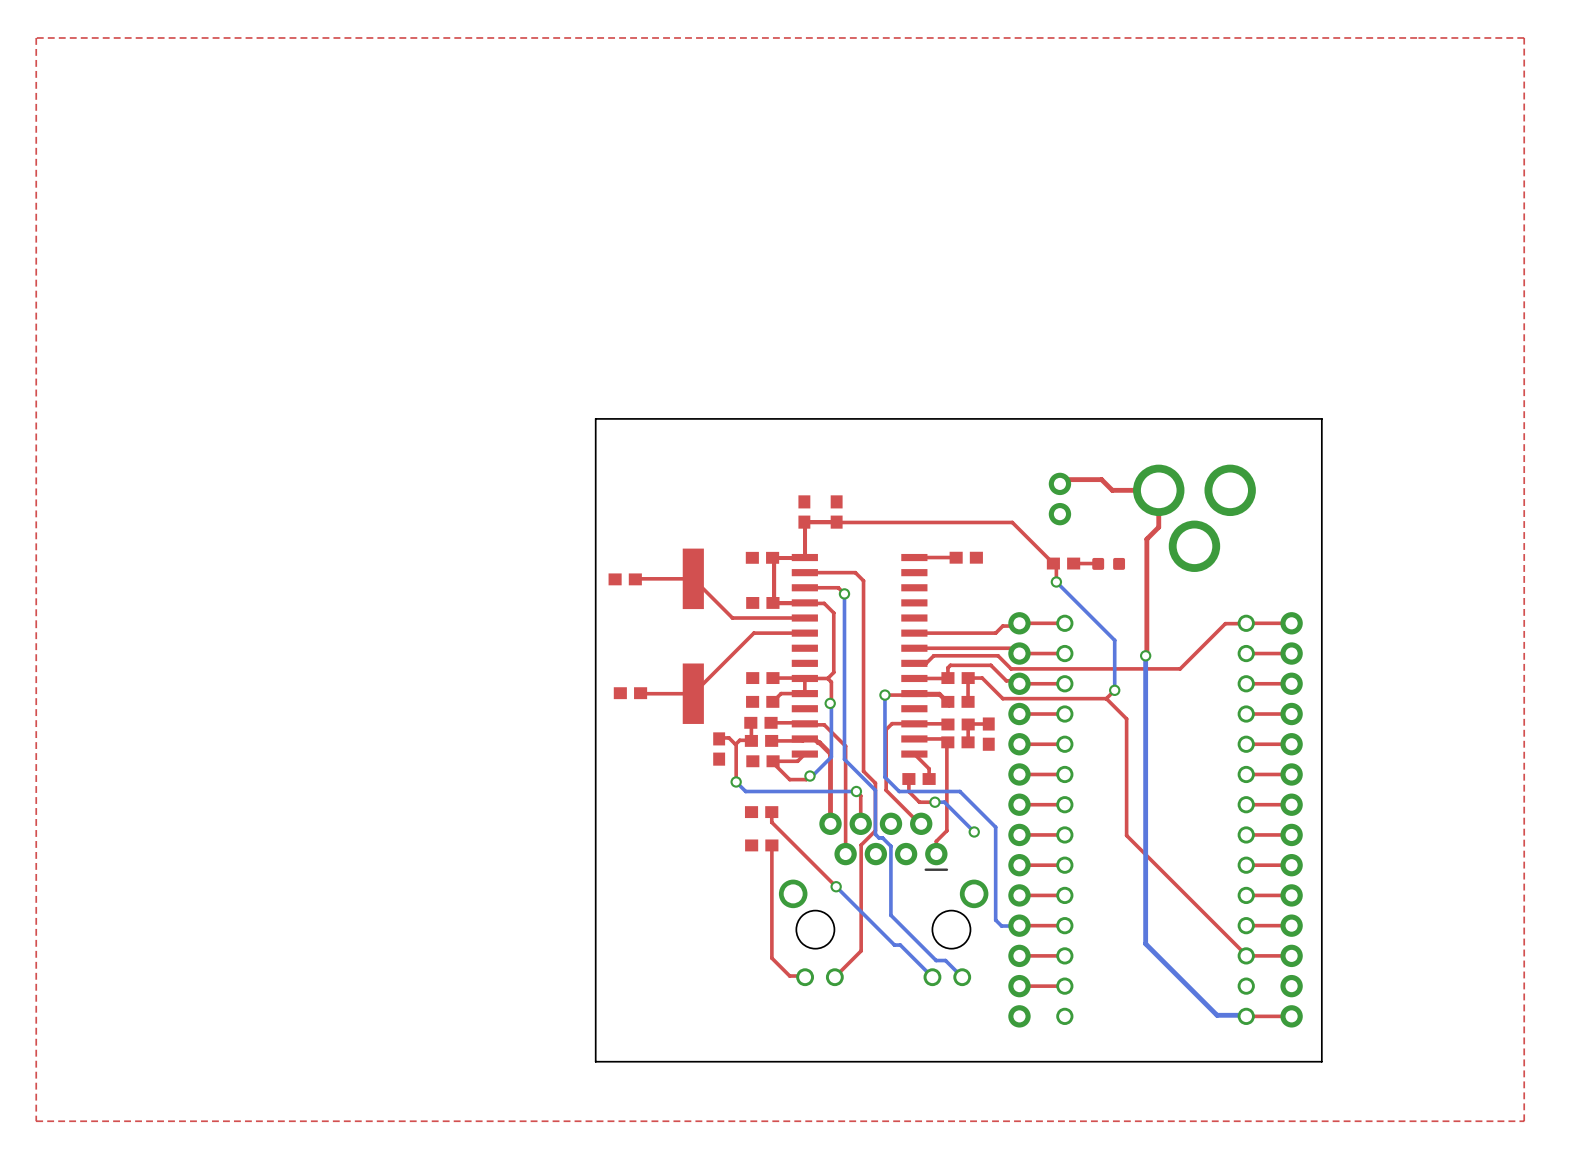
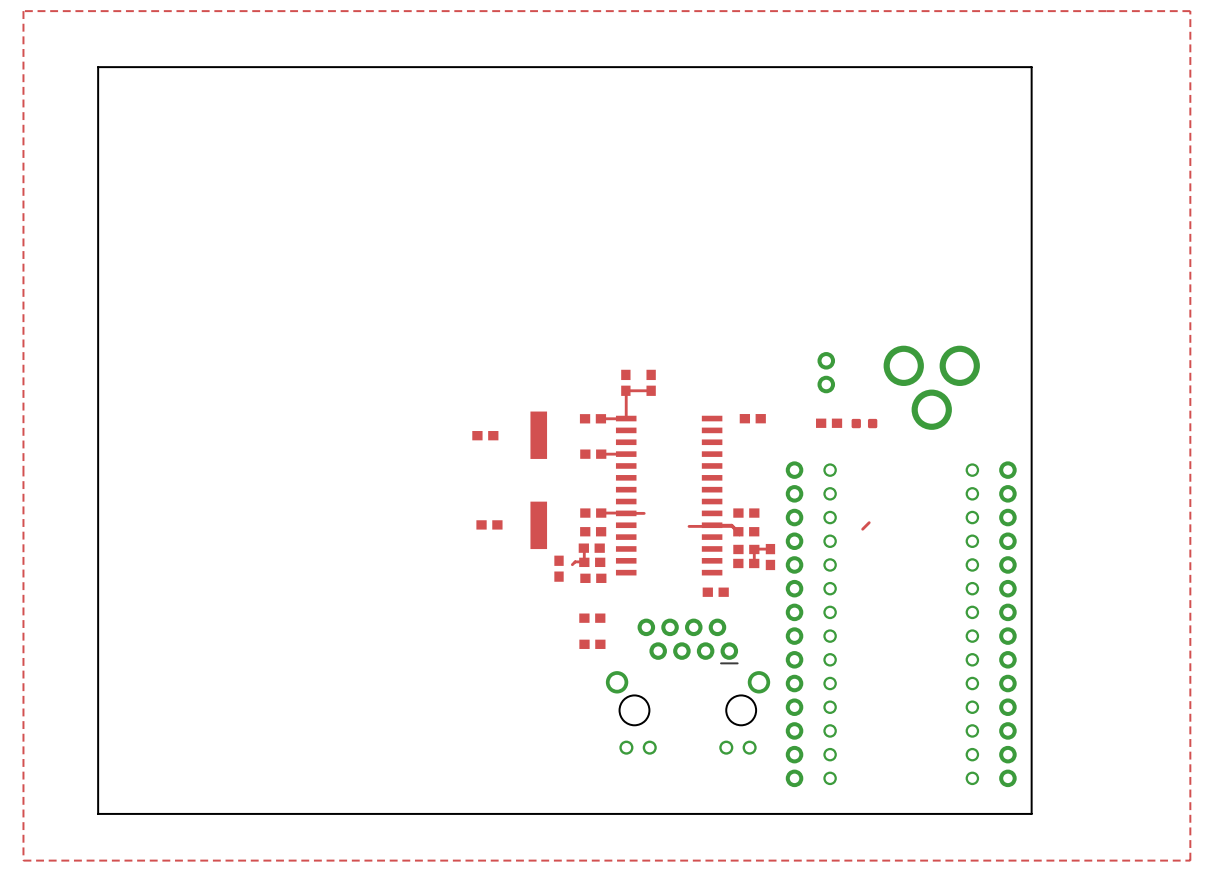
board edge: (1321, 418) (595, 418) (595, 1061) -> (1031, 309) (1031, 67) (98, 67) (98, 813) (462, 813)
top track: (1059, 483) (1064, 479) (1101, 479) (1112, 490) (1158, 490) (1158, 527) (1146, 539) (1145, 655) -> none
top track: (914, 557) (956, 557) -> none
top track: (1073, 563) (1098, 563) -> none
top track: (804, 572) (855, 572) (863, 580) (863, 771) (875, 783) (875, 830) (861, 845) (861, 950) (834, 977) -> none
top track: (635, 579) (693, 578) (732, 618) (804, 618) -> none
top track: (1056, 581) (1056, 566) (1012, 522) (804, 522) (805, 557) (774, 558) (774, 603) (824, 603) (833, 612) (833, 672) (827, 678) (831, 682) (830, 703) -> none
bottom track: (1056, 581) (1114, 640) (1114, 690) -> none
via: (1056, 581) -> none
top track: (804, 587) (838, 587) (844, 593) -> none
bottom track: (844, 593) (844, 759) (875, 790) (875, 834) (879, 837) (882, 837) (890, 846) (890, 915) (936, 960) (945, 960) (962, 977) -> none
via: (844, 593) -> none
top track: (1064, 623) (1019, 623) (1016, 626) (1002, 626) (995, 633) (914, 633) -> none
top track: (1291, 623) (1225, 623) (1180, 668) (1011, 668) (998, 655) (933, 655) (926, 663) (914, 663) -> none
top track: (804, 633) (753, 633) (693, 693) (640, 693) -> none
top track: (914, 648) (1014, 648) (1019, 653) (1064, 653) -> none
top track: (1291, 653) (1246, 653) -> none
bottom track: (1145, 655) (1145, 943) (1217, 1015) (1246, 1016) -> none
via: (1145, 655) -> none
top track: (804, 678) (804, 693) (781, 693) (772, 701) -> none
top track: (914, 678) (947, 678) (947, 667) (950, 665) (990, 665) (1006, 680) (1016, 680) (1019, 683) (1064, 683) -> none
top track: (968, 678) (982, 678) (1002, 698) (1106, 698) (1126, 718) (1126, 835) (1246, 955) (1291, 955) -> none
top track: (968, 678) (968, 701) -> none
top track: (1291, 683) (1246, 683) -> none
via: (1114, 690) -> none
bottom track: (884, 695) (884, 777) (899, 791) (959, 791) (995, 827) (995, 920) (1001, 926) (1019, 925) -> none
via: (884, 695) -> none
bottom track: (830, 703) (831, 756) (812, 776) (809, 776) -> none
via: (830, 703) -> none
top track: (1064, 714) (1019, 714) -> none
top track: (1291, 714) (1246, 714) -> none
top track: (771, 722) (824, 724) (845, 746) (845, 854) -> none
top track: (947, 724) (892, 723) (886, 729) (886, 790) (921, 823) -> none
top track: (719, 738) (729, 737) (736, 743) (736, 781) -> none
top track: (914, 738) (944, 738) (947, 742) (946, 830) (936, 841) (936, 854) -> none
top track: (771, 740) (814, 739) (830, 753) (830, 823) -> none
top track: (1064, 744) (1019, 744) -> none
top track: (1291, 744) (1246, 744) -> none
top track: (804, 754) (797, 761) (773, 761) (773, 762) (789, 779) (806, 779) (809, 776) -> none
top track: (914, 754) (929, 768) (929, 779) -> none
top track: (1064, 774) (1019, 774) -> none
top track: (1291, 774) (1246, 774) -> none
via: (809, 776) -> none
top track: (908, 779) (908, 791) (919, 802) (934, 802) -> none
bottom track: (736, 781) (745, 791) (856, 791) -> none
via: (736, 781) -> none
top track: (856, 791) (860, 795) (860, 823) -> none
via: (856, 791) -> none
bottom track: (934, 802) (944, 802) (974, 831) -> none
via: (934, 802) -> none
top track: (1064, 804) (1019, 804) -> none
top track: (1291, 804) (1246, 804) -> none
top track: (771, 812) (771, 822) (836, 886) -> none
via: (974, 831) -> none
top track: (1064, 834) (1019, 834) -> none
top track: (1291, 834) (1246, 834) -> none
top track: (771, 845) (771, 958) (789, 976) (805, 977) -> none
top track: (1064, 865) (1019, 865) -> none
top track: (1291, 865) (1246, 865) -> none
bottom track: (836, 886) (894, 945) (900, 945) (932, 977) -> none
via: (836, 886) -> none
top track: (1064, 895) (1019, 895) -> none
top track: (1291, 895) (1246, 895) -> none
top track: (1064, 925) (1019, 925) -> none
top track: (1291, 925) (1246, 925) -> none
top track: (1064, 955) (1019, 955) -> none
top track: (1064, 986) (1019, 986) -> none
top track: (1291, 1016) (1246, 1016) -> none

